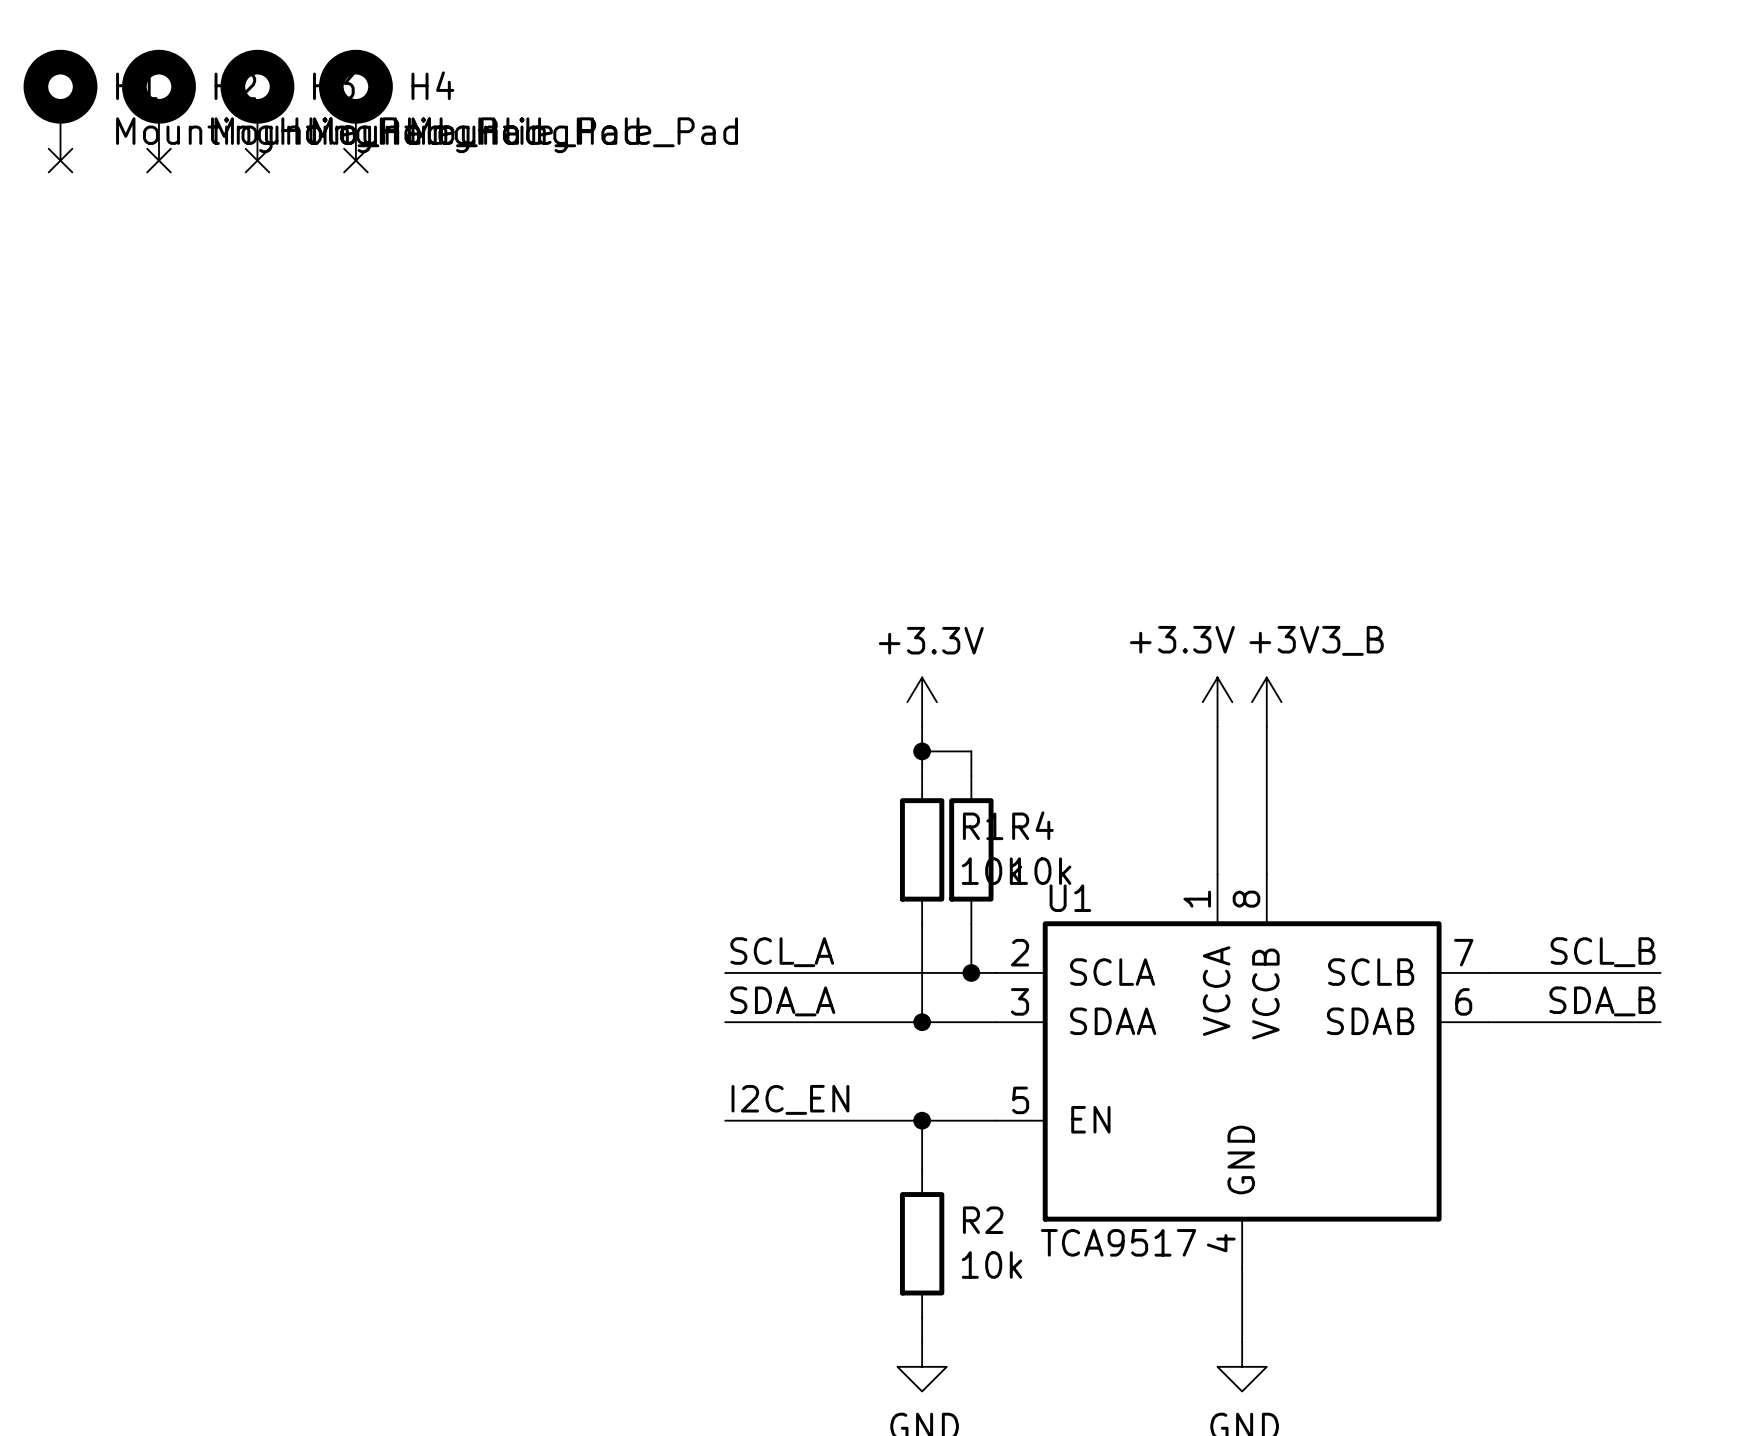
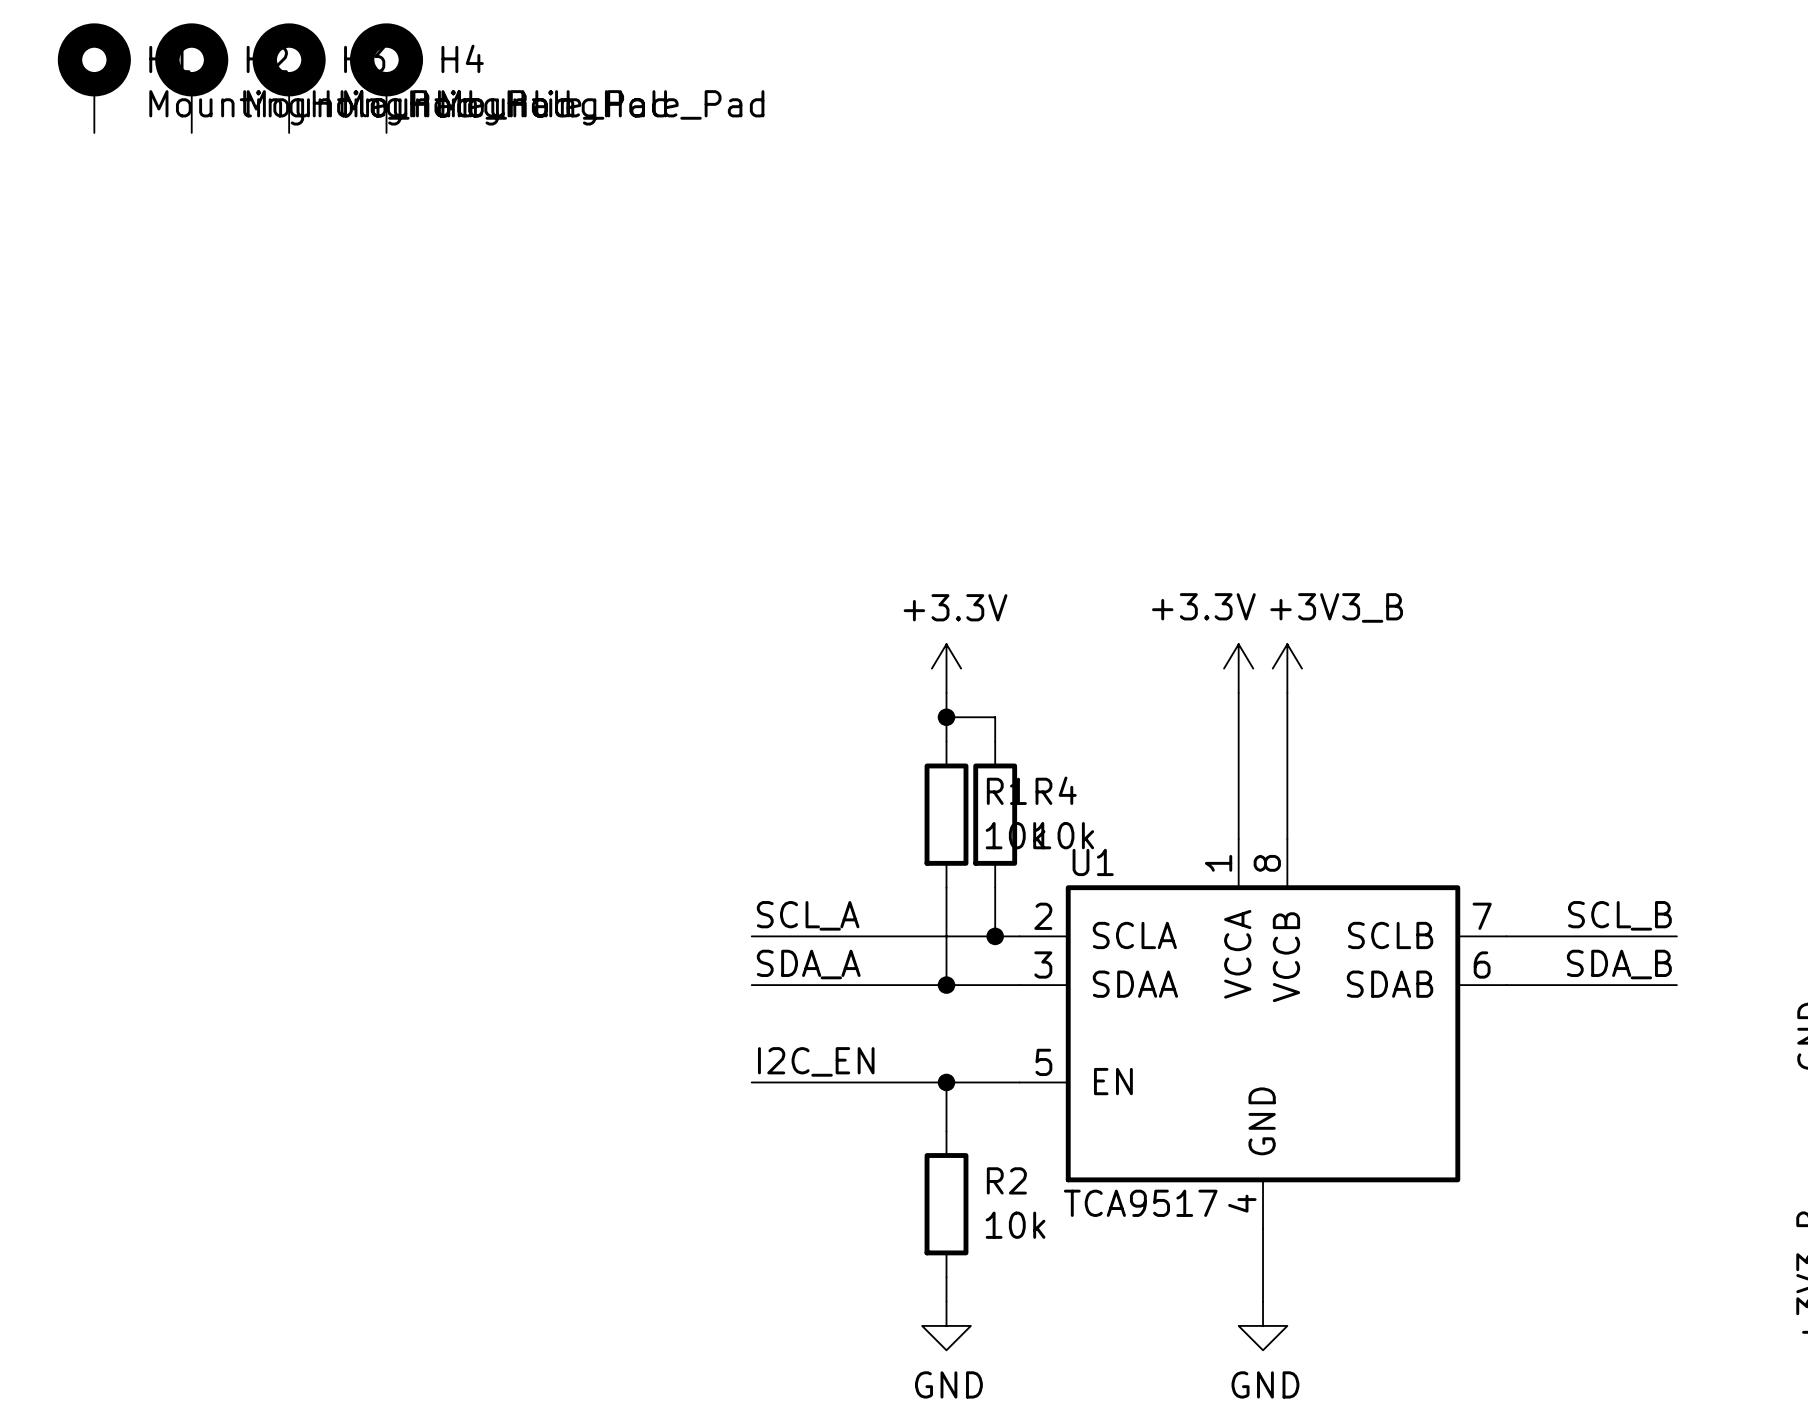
no-connect mark: (60, 160) -> none
no-connect mark: (158, 160) -> none
no-connect mark: (257, 160) -> none
no-connect mark: (355, 160) -> none

